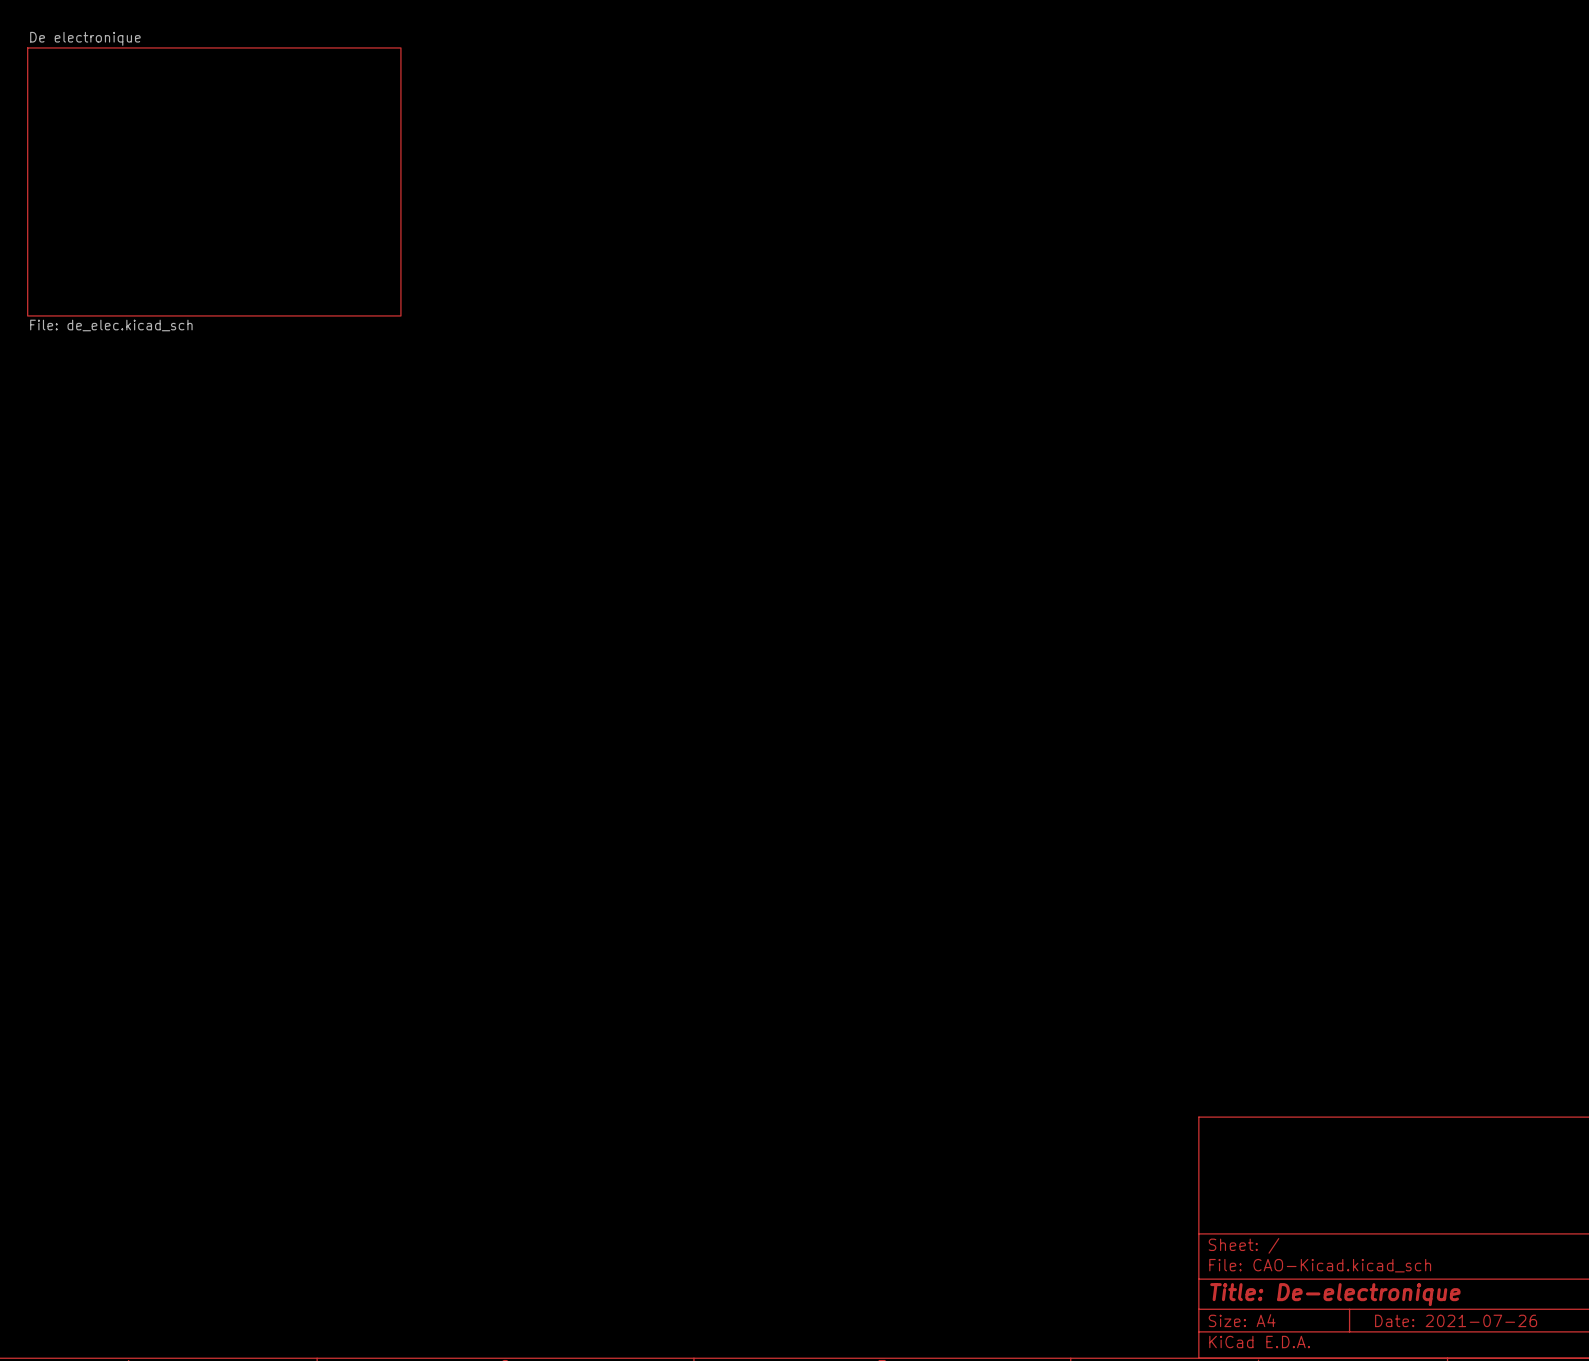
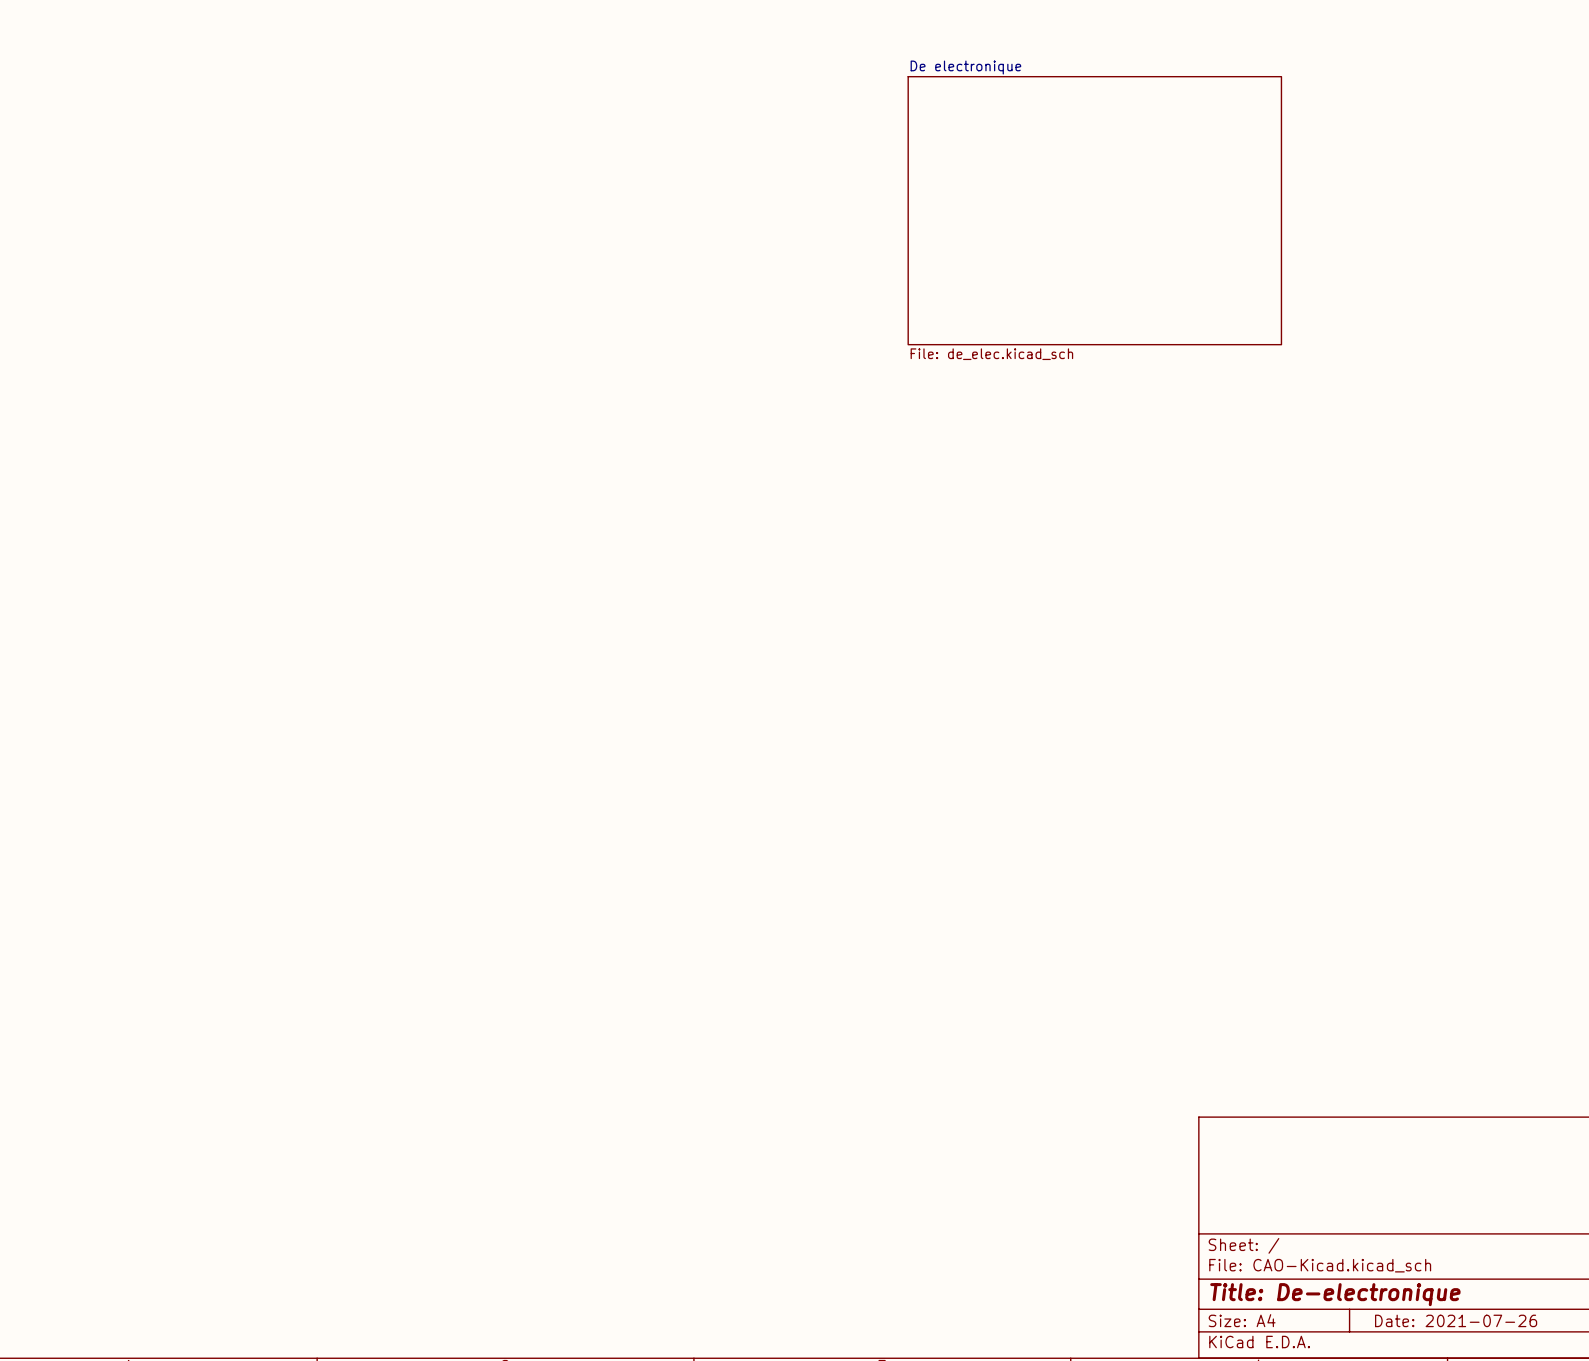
sheet De electronique: File: de_elec.kicad_sch (214, 181) -> none
sheet De electronique: none -> File: de_elec.kicad_sch (1094, 210)

